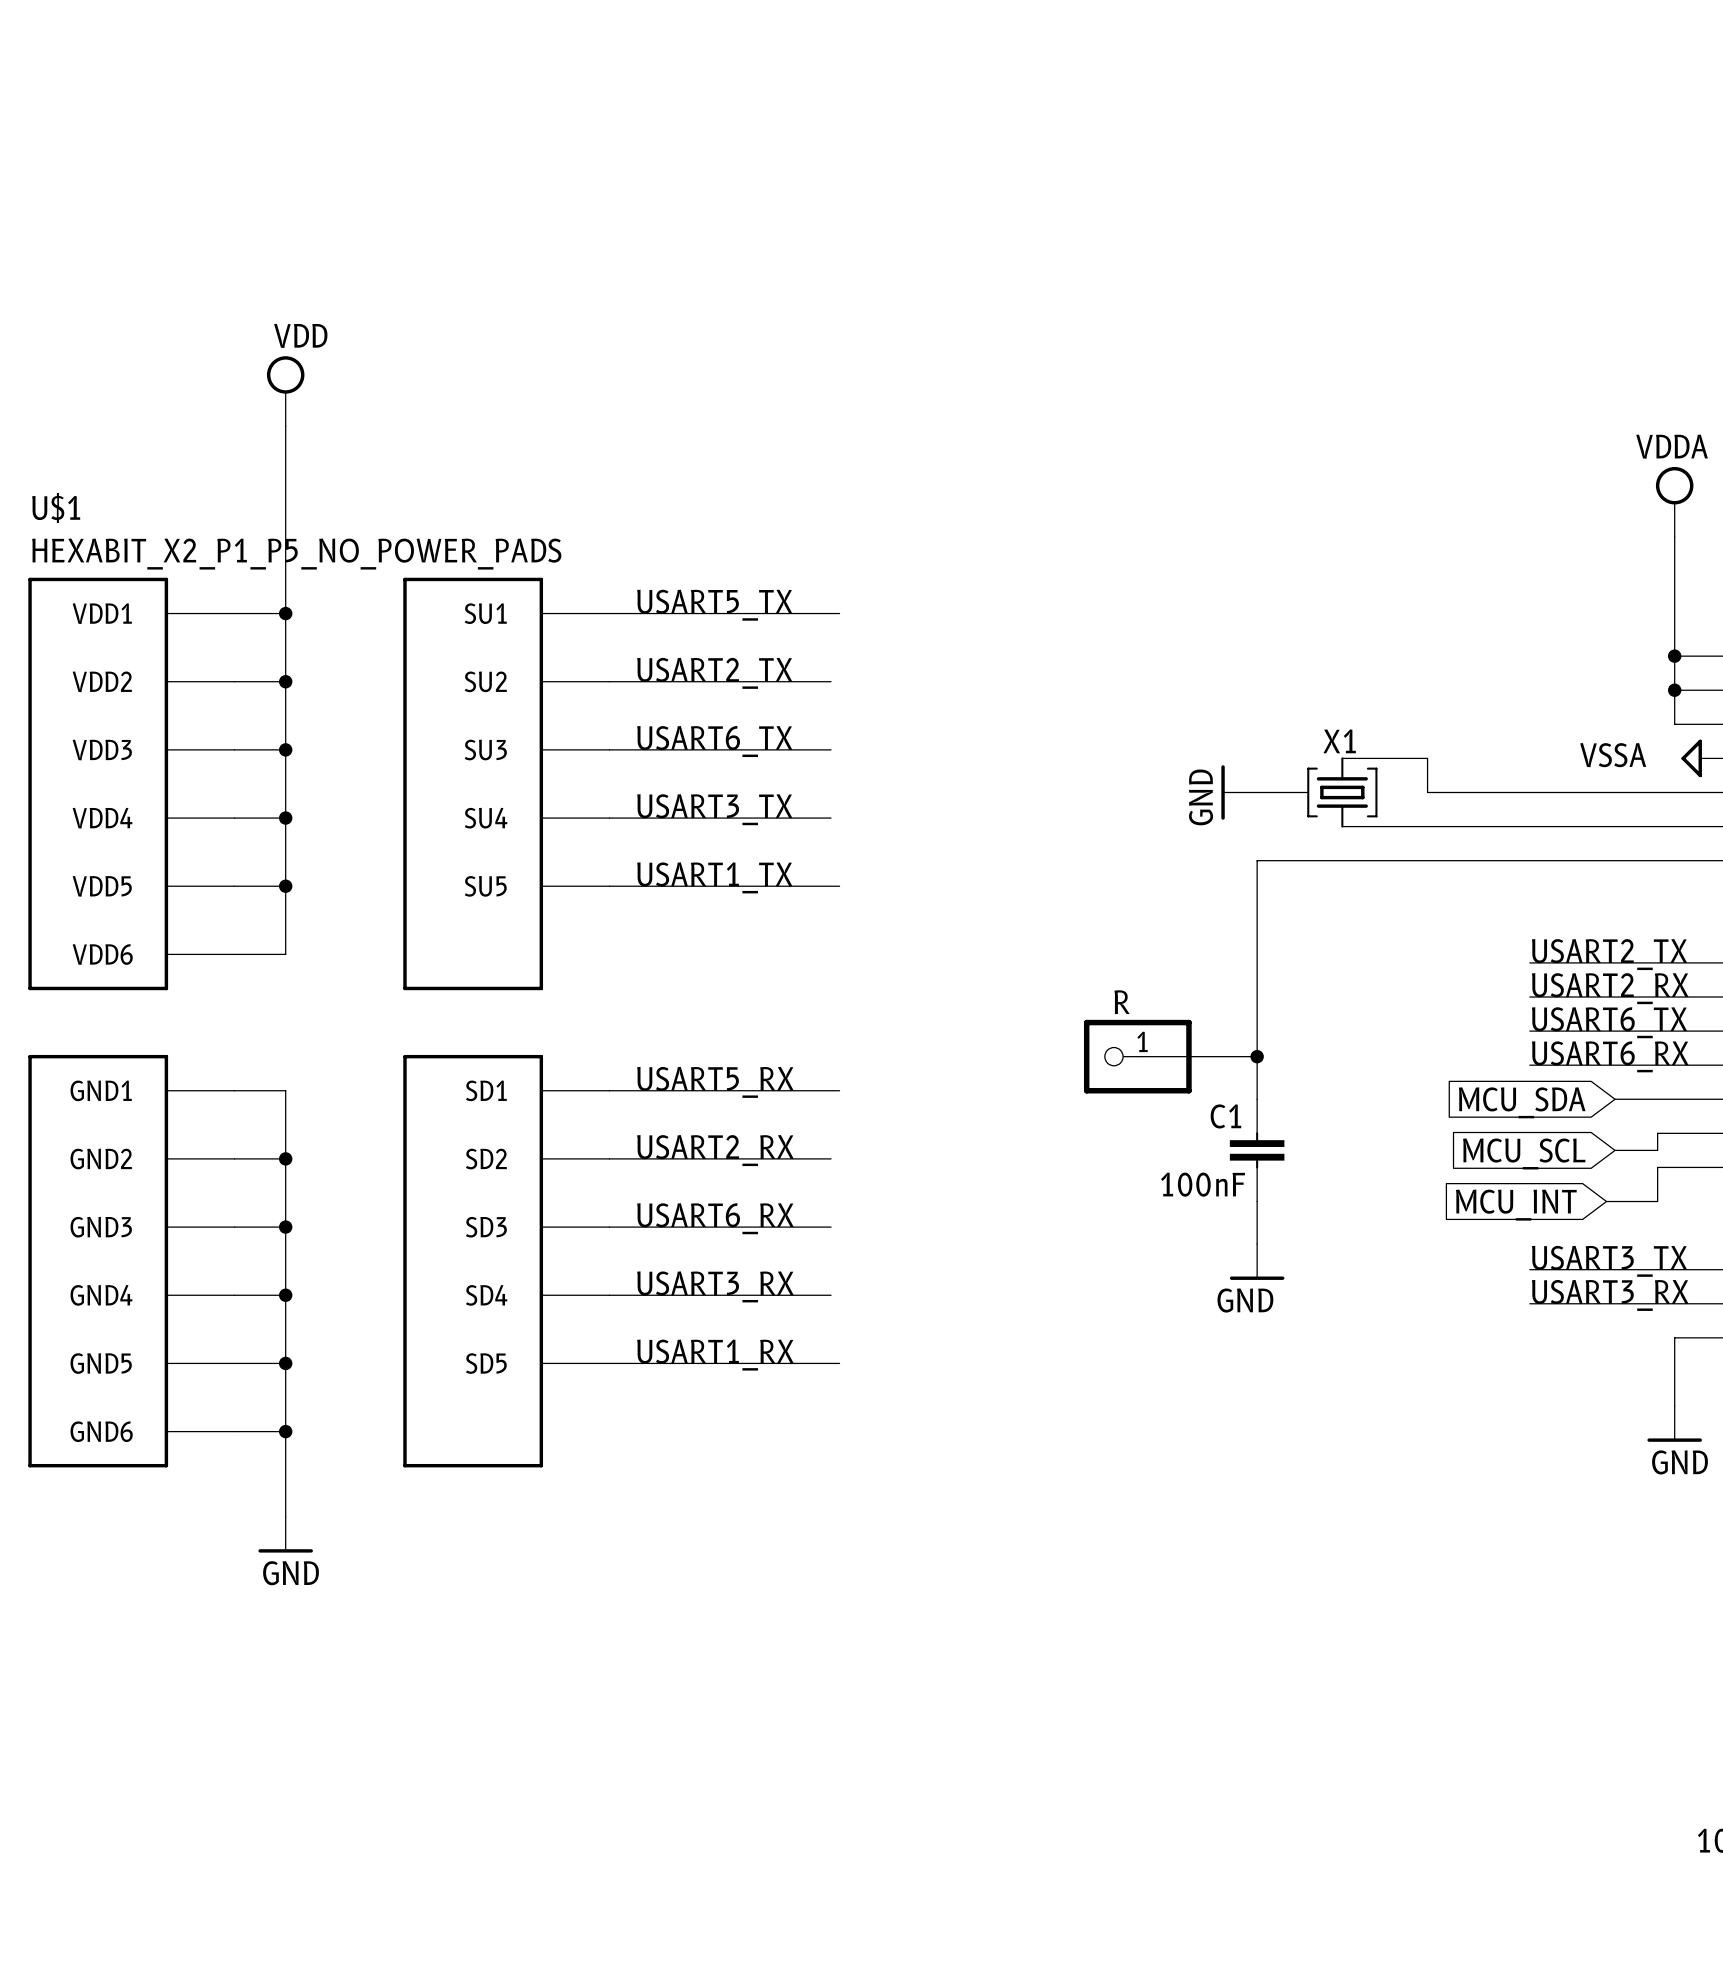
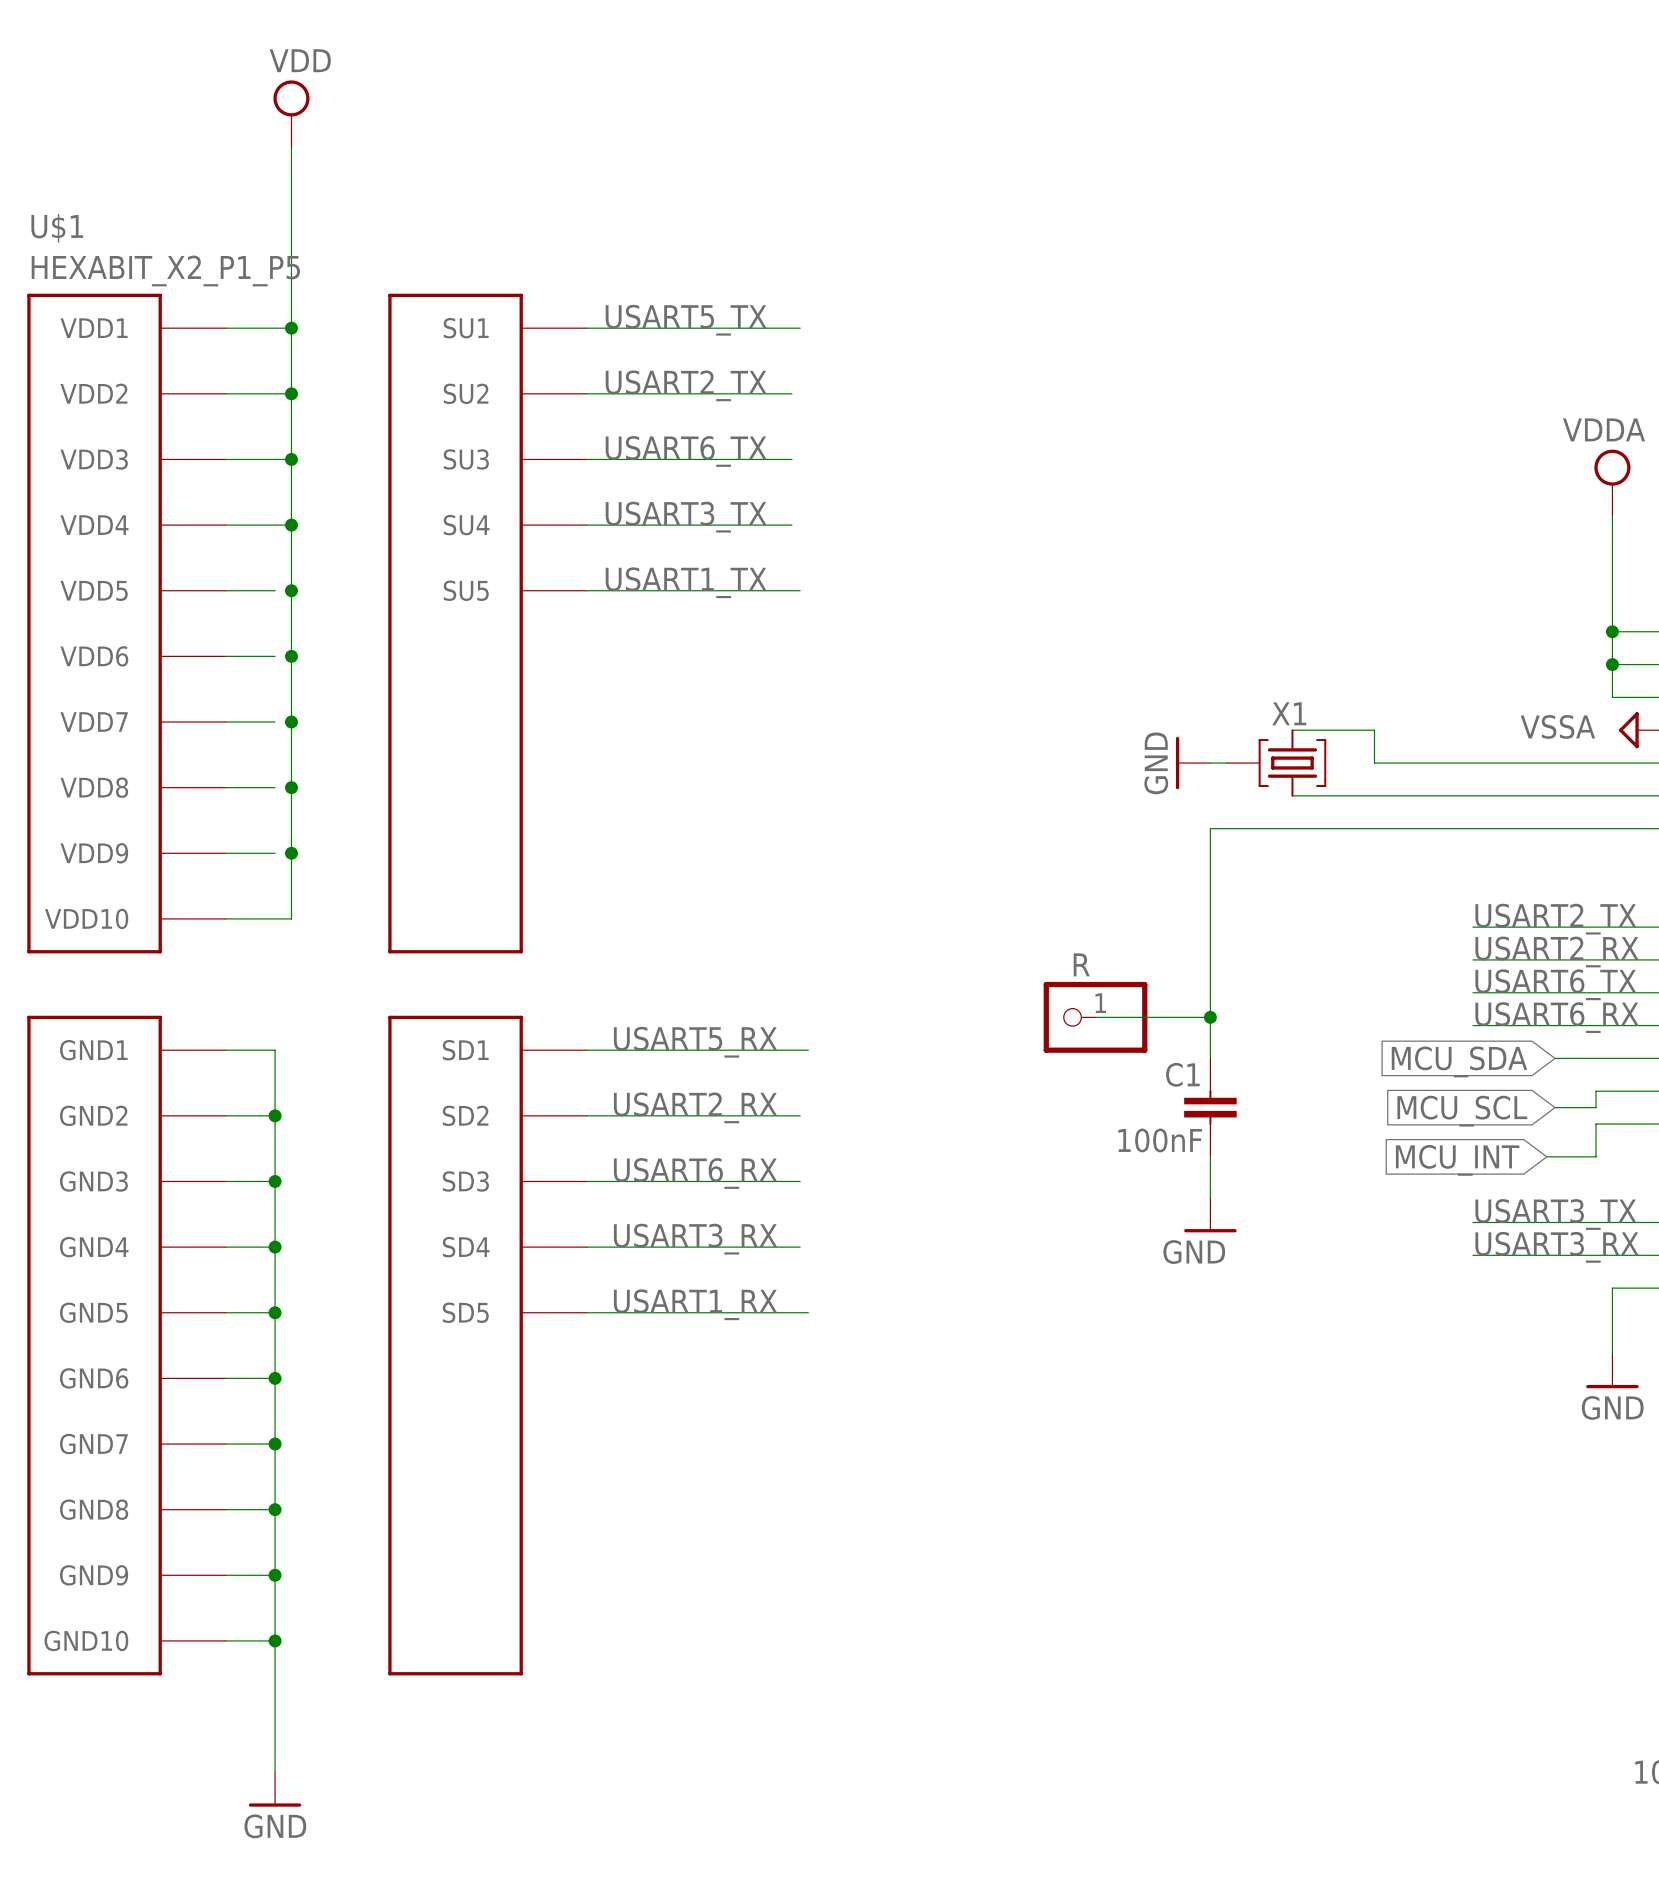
wire: none -> (225, 328) (291, 328)
junction: none -> (291, 328)
wire: none -> (586, 328) (800, 328)
power symbol position: VDD (285, 391) -> VDD (291, 114)
wire: none -> (225, 393) (291, 393)
junction: none -> (291, 393)
wire: none -> (586, 393) (791, 393)
wire: (285, 426) (285, 954) -> (291, 147) (291, 918) (275, 918)
wire: none -> (225, 459) (291, 459)
junction: none -> (291, 459)
wire: none -> (586, 459) (791, 459)
U$1 name position: U$1 (56, 507) -> U$1 (57, 228)
wire: none -> (225, 525) (291, 525)
junction: none -> (291, 525)
wire: none -> (586, 525) (791, 525)
U$1 value: HEXABIT_X2_P1_P5_NO_POWER_PADS (296, 554) -> HEXABIT_X2_P1_P5 (165, 270)
U$1 symbol: [28, 577, 610, 1468] -> [27, 293, 587, 1676]
label position: USART5_TX (714, 605) -> USART5_TX (686, 320)
junction position: (285, 613) -> (291, 590)
wire: (831, 613) (839, 613) -> none
label position: USART2_TX (714, 673) -> USART2_TX (686, 385)
junction position: (285, 681) -> (291, 656)
wire: (609, 681) (831, 681) -> none
label position: USART6_TX (714, 741) -> USART6_TX (686, 451)
junction position: (285, 749) -> (291, 722)
wire: (609, 749) (831, 749) -> none
label position: USART3_TX (714, 809) -> USART3_TX (686, 517)
junction position: (285, 818) -> (291, 787)
wire: (609, 818) (831, 818) -> none
label position: USART1_TX (714, 877) -> USART1_TX (686, 582)
junction position: (285, 886) -> (291, 853)
wire: (609, 886) (839, 886) -> none
wire: none -> (225, 1444) (275, 1444)
junction: none -> (275, 1444)
wire: none -> (275, 1460) (275, 1772)
power symbol position: GND (285, 1534) -> GND (275, 1789)
wire: none -> (225, 1509) (275, 1509)
junction: none -> (275, 1509)
wire: none -> (225, 1575) (275, 1575)
junction: none -> (275, 1575)
wire: none -> (225, 1640) (275, 1640)
junction: none -> (275, 1640)

